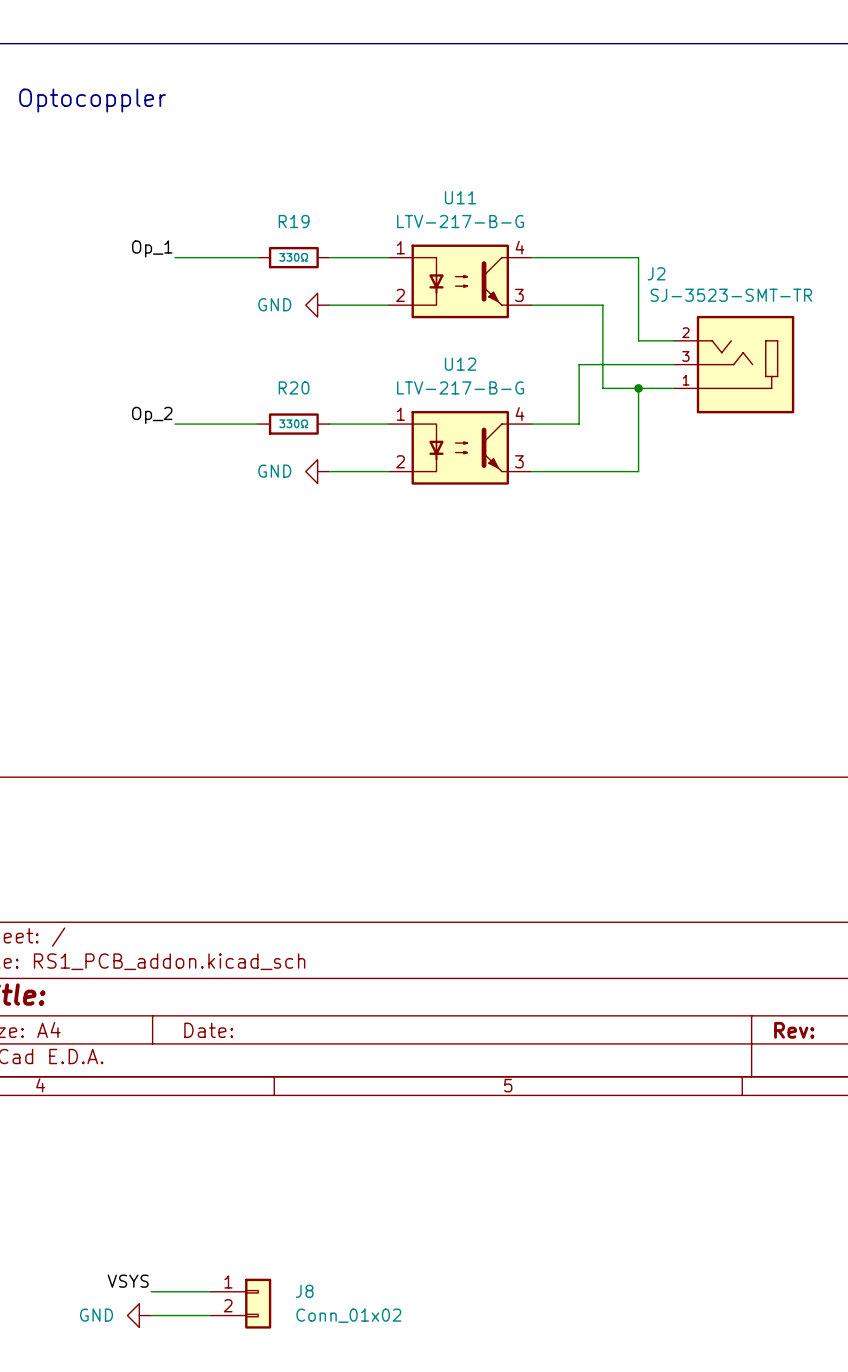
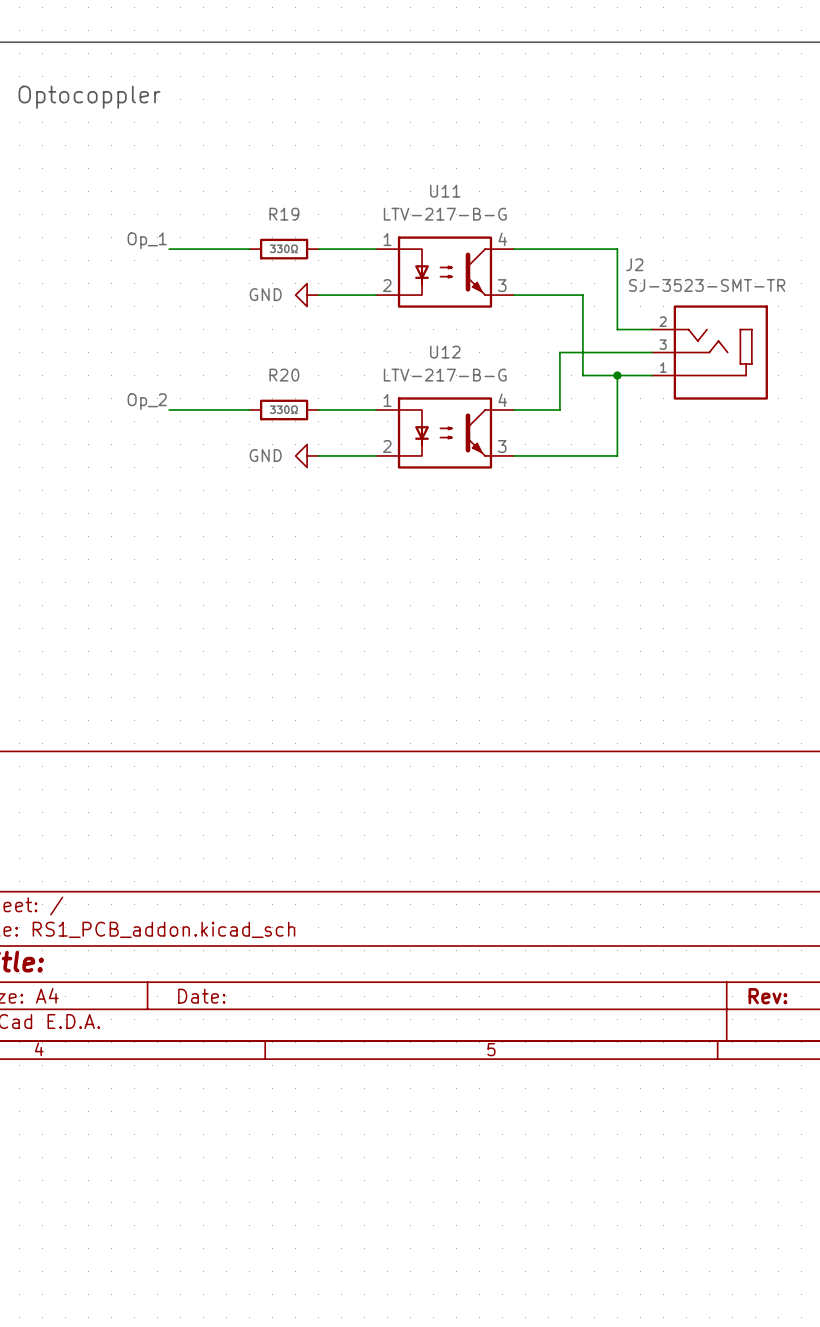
label: VSYS (128, 1281) -> none
wire: (151, 1291) (210, 1291) -> none
J8: Conn_01x02 (240, 1303) -> none
power symbol: GND (139, 1315) -> none
wire: (151, 1315) (210, 1315) -> none

